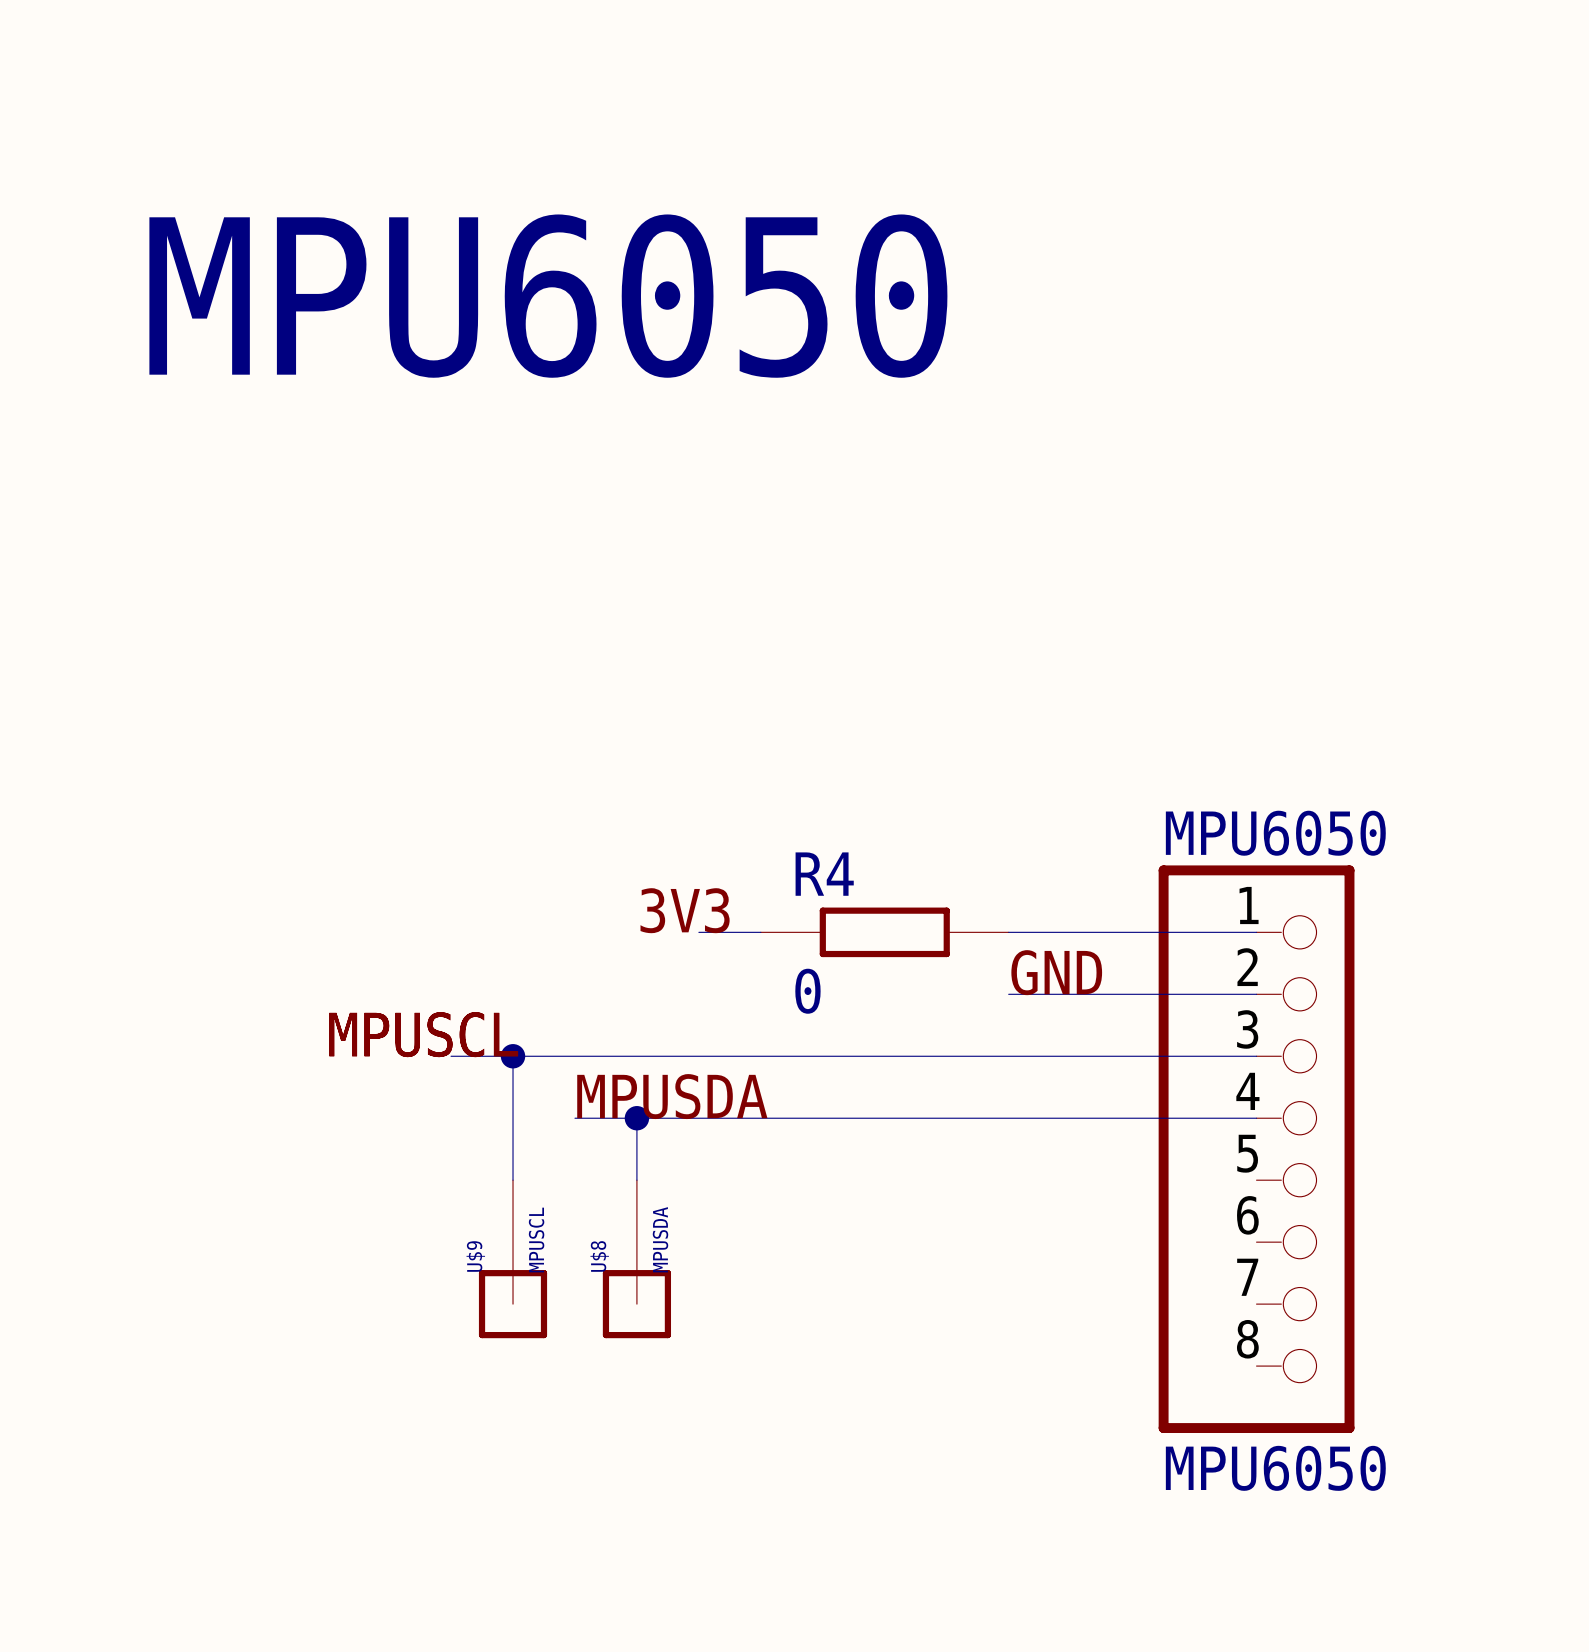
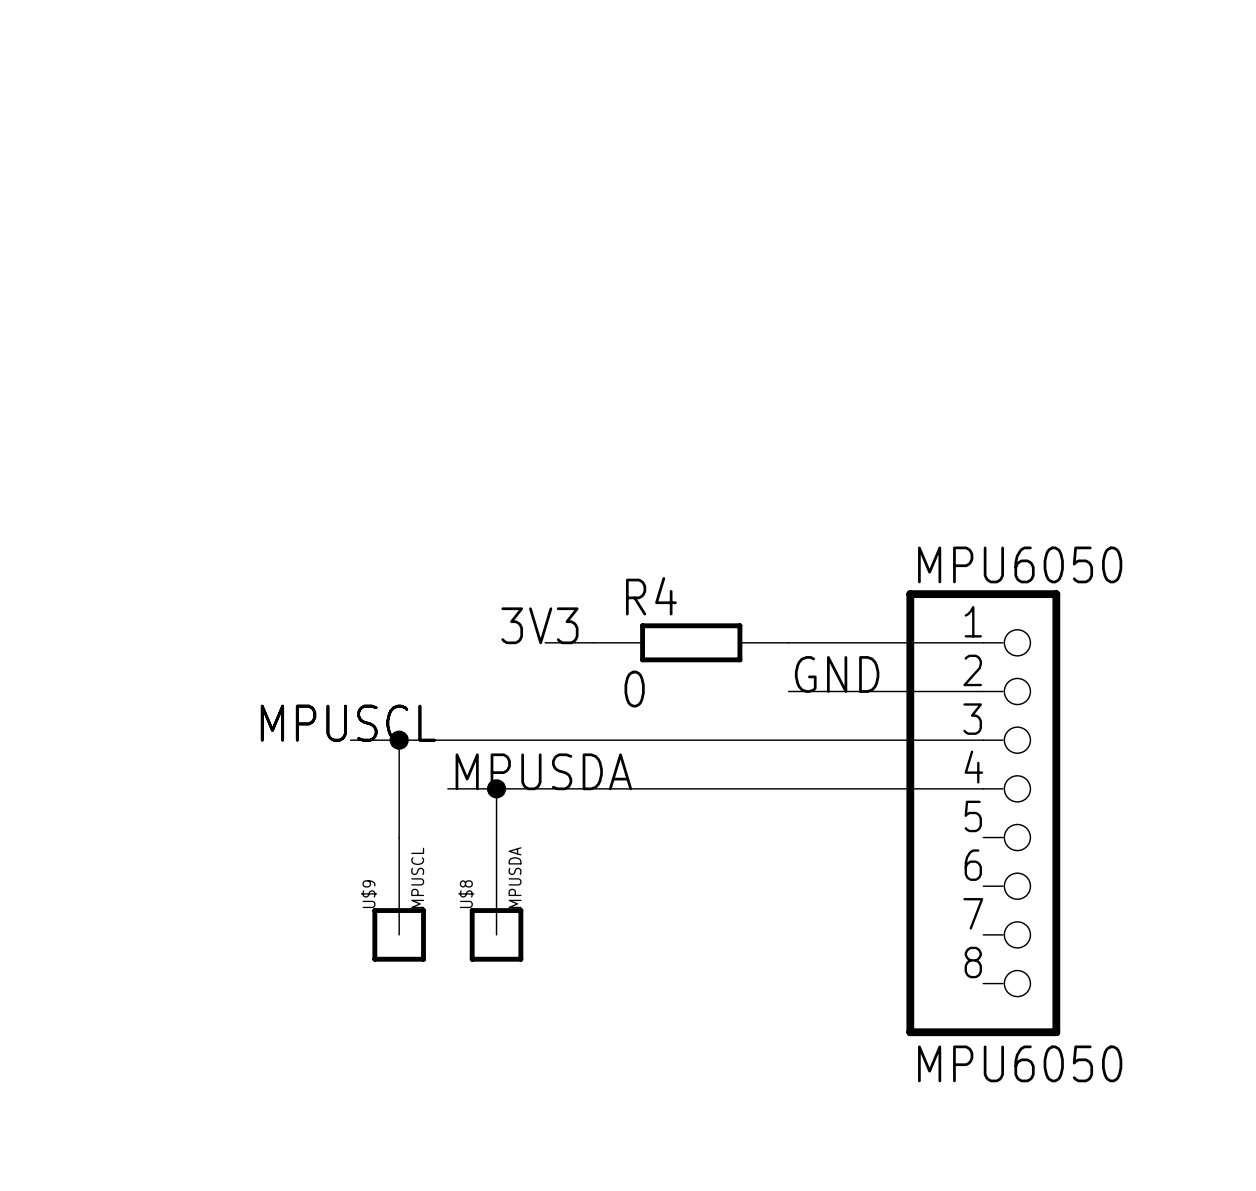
text: MPU6050 (548, 296) -> none

